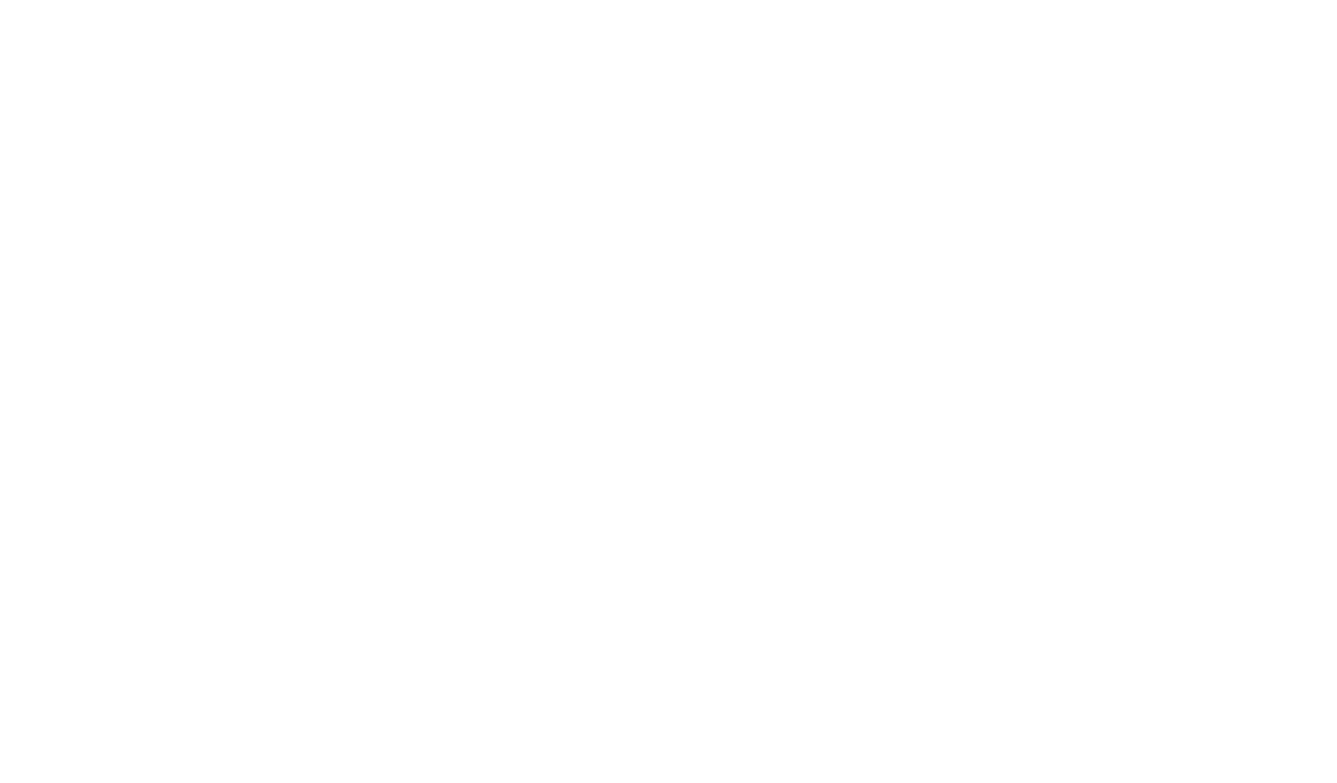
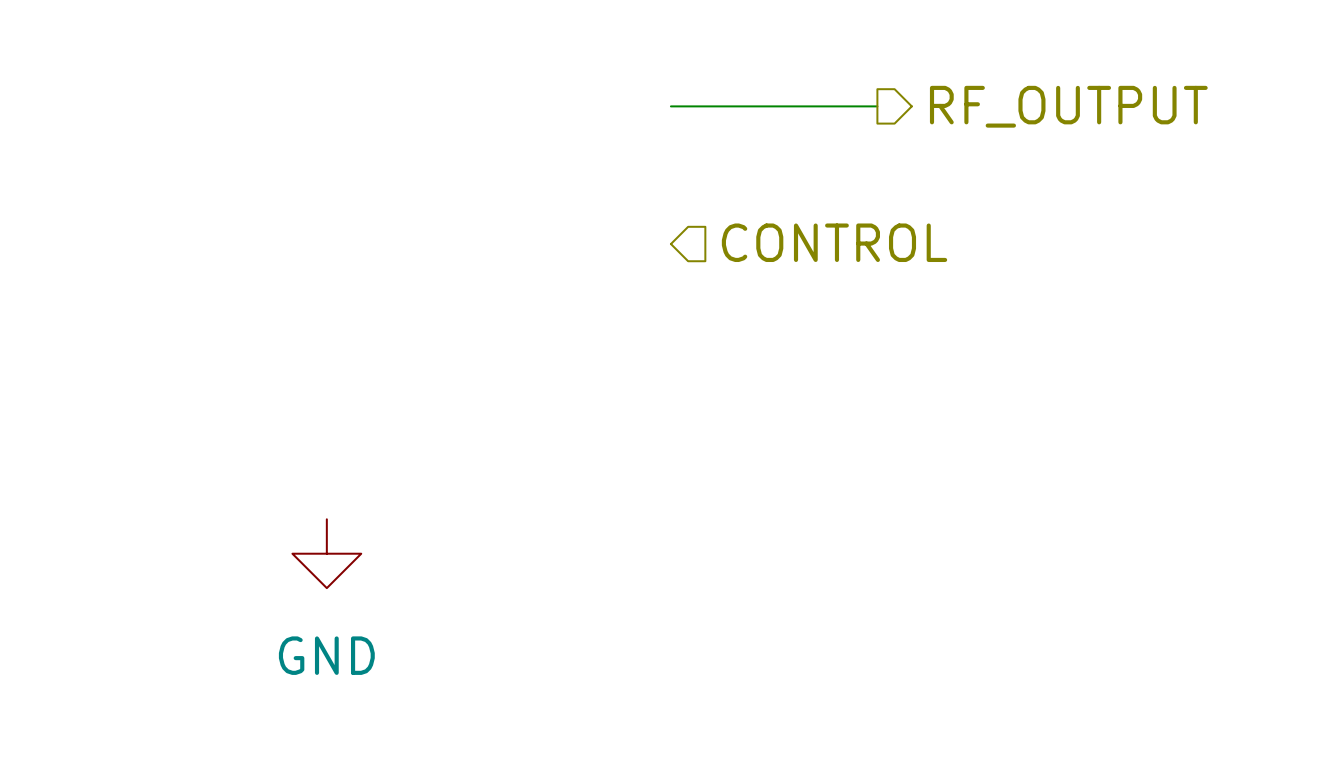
wire: none -> (670, 106) (877, 106)
hierarchical label: none -> RF_OUTPUT (1068, 106)
hierarchical label: none -> CONTROL (834, 242)
power symbol: none -> GND (326, 553)

